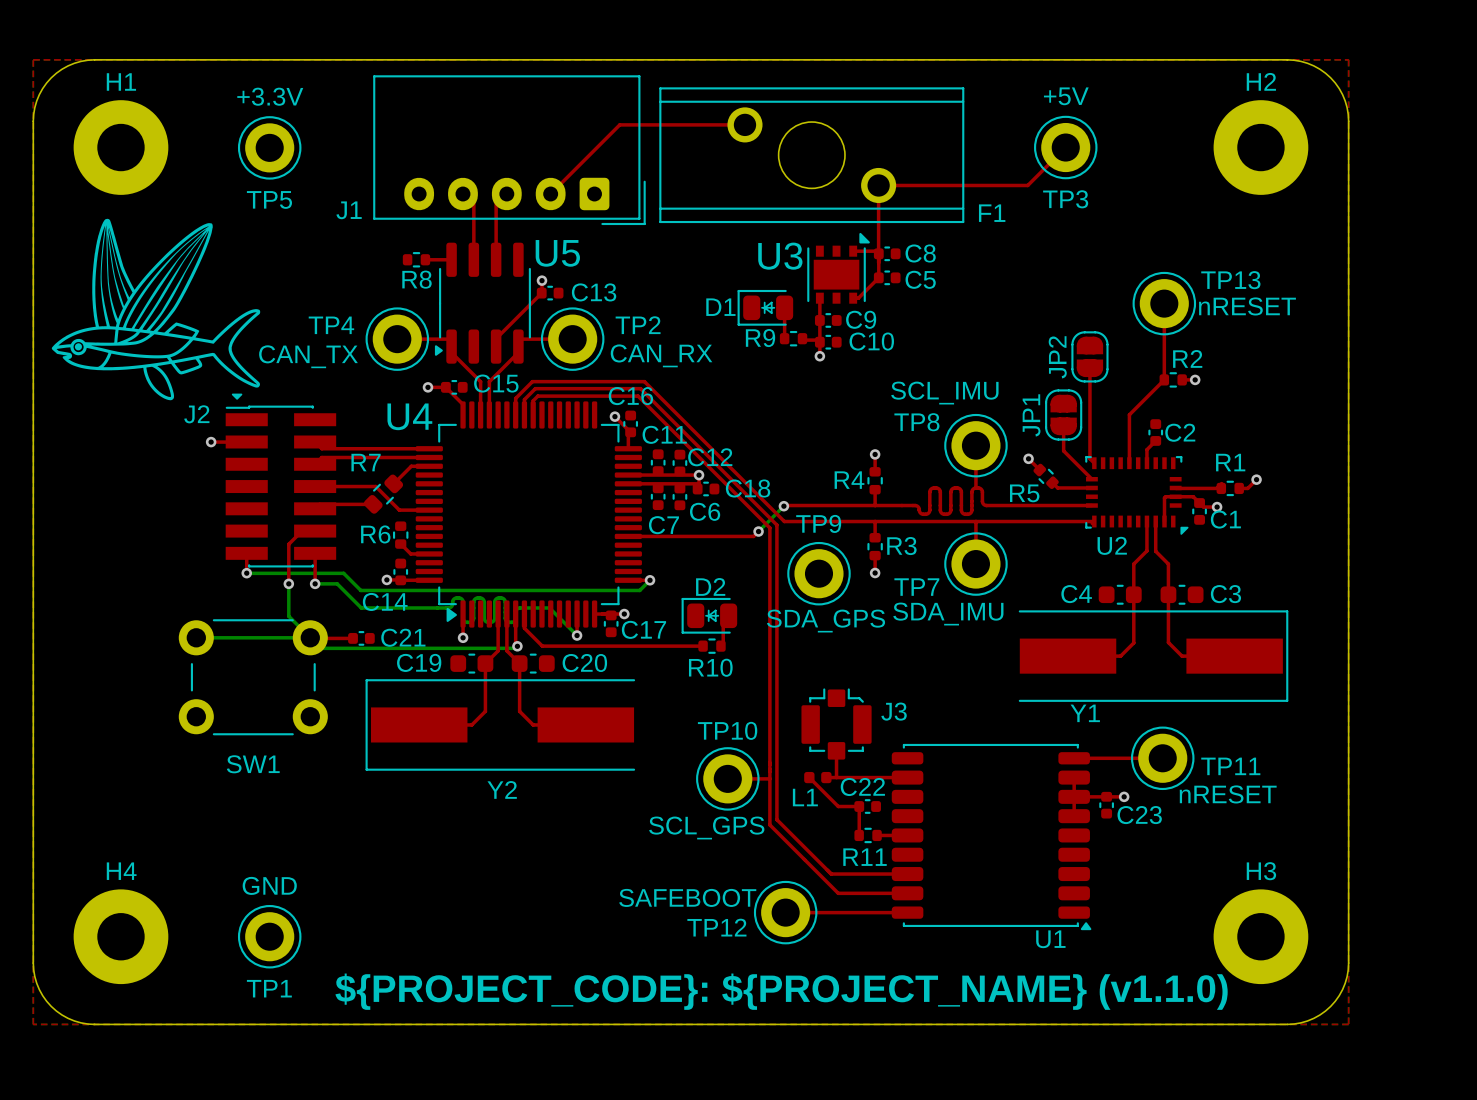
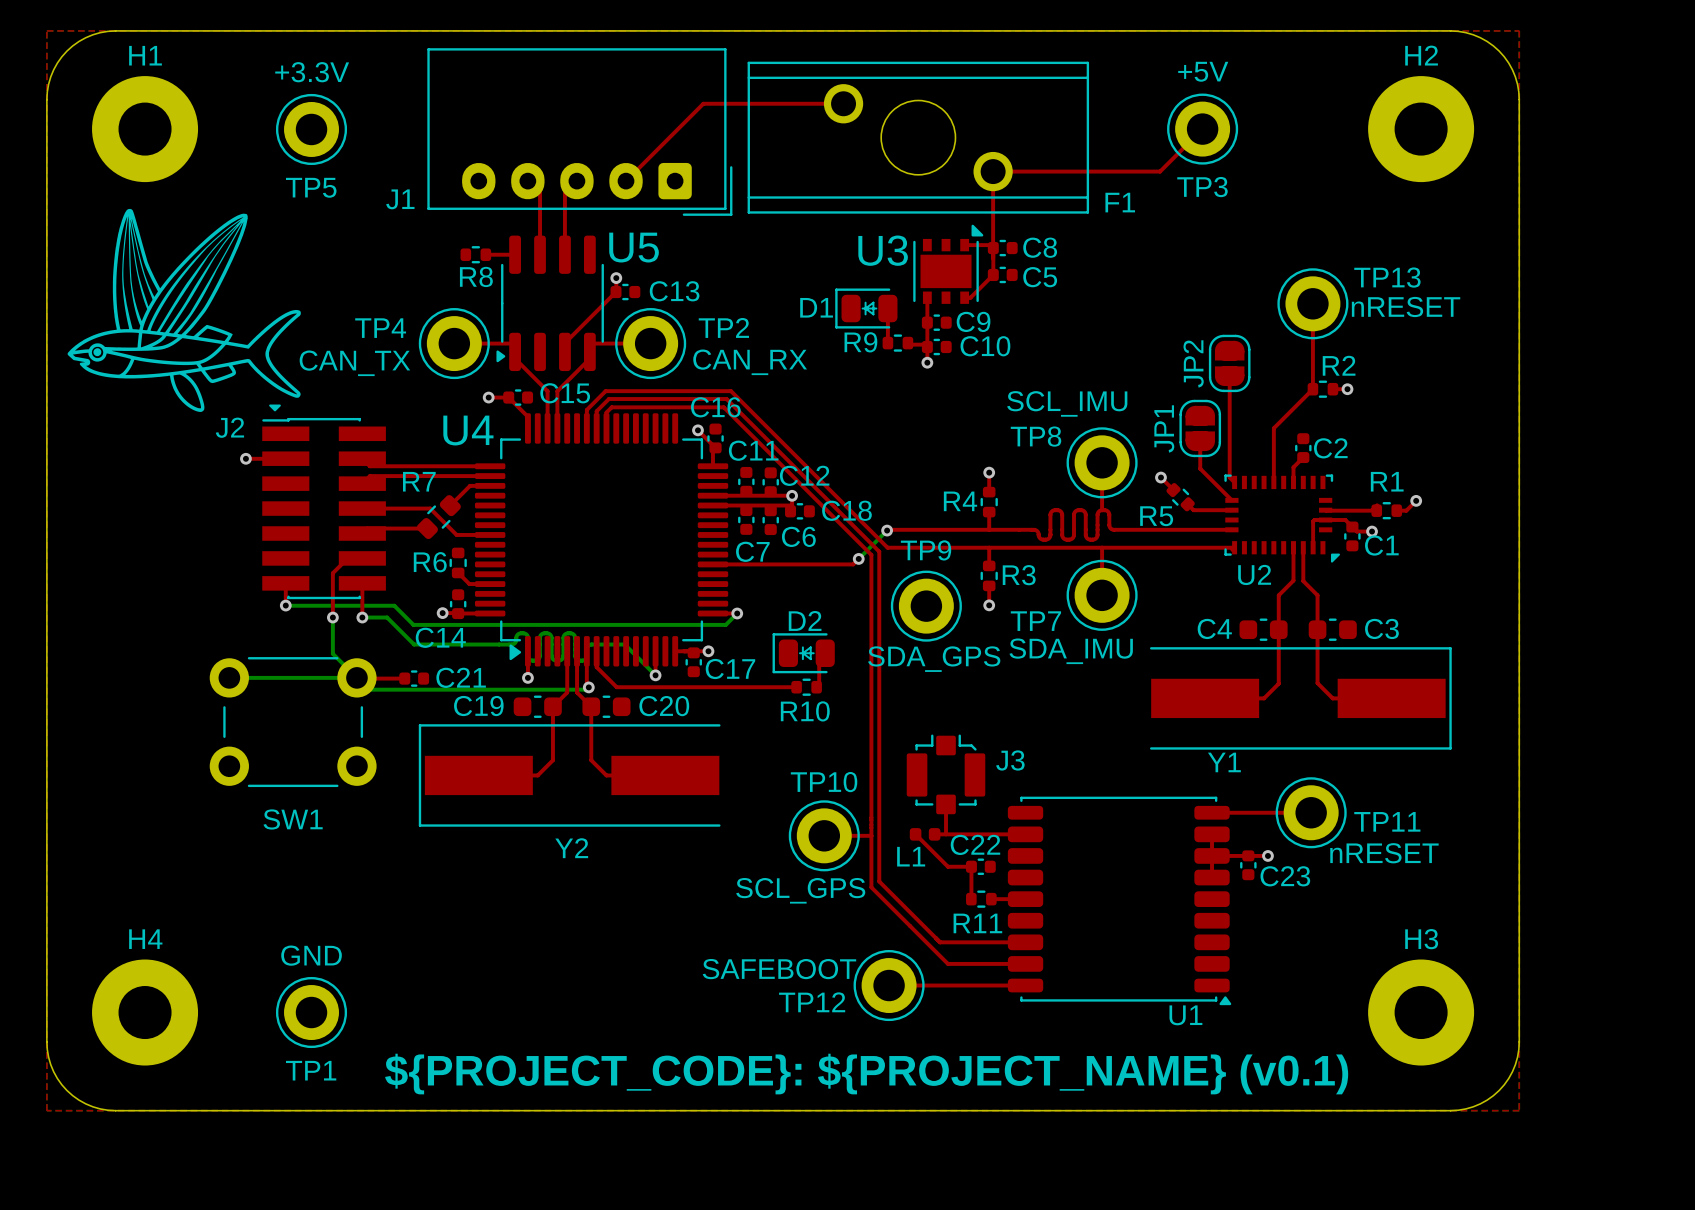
text: ${PROJECT_CODE}: ${PROJECT_NAME} (v1.1.0) (781, 991) -> ${PROJECT_CODE}: ${PROJECT_NAME} (v0.1) (866, 1074)

